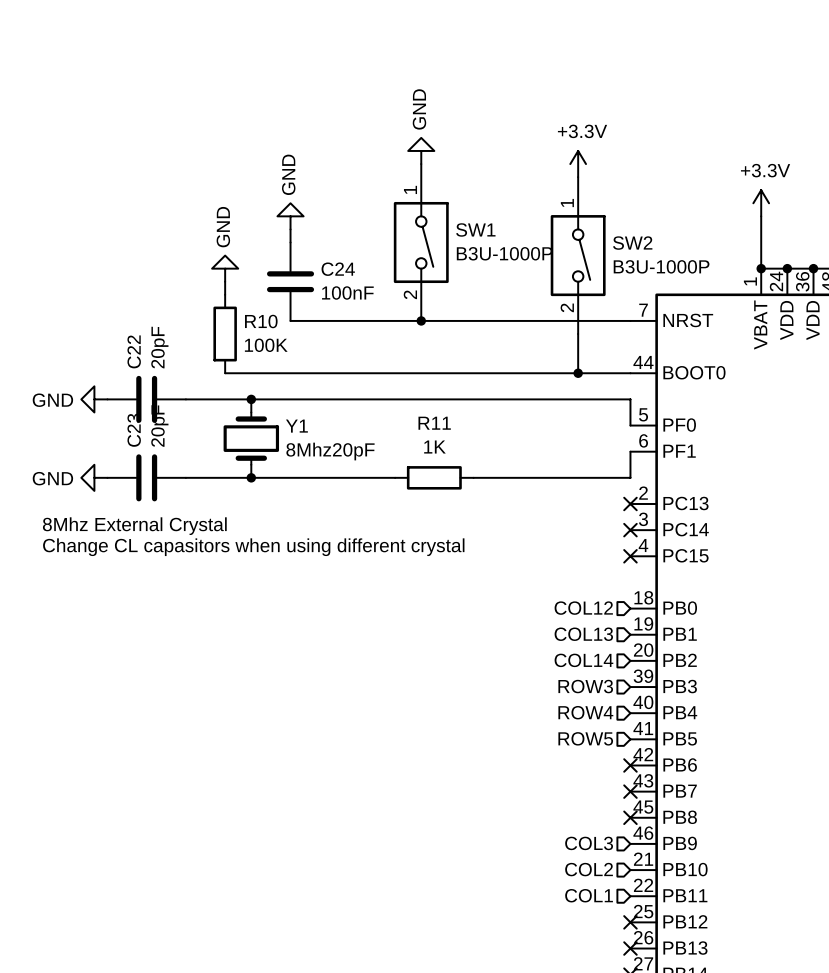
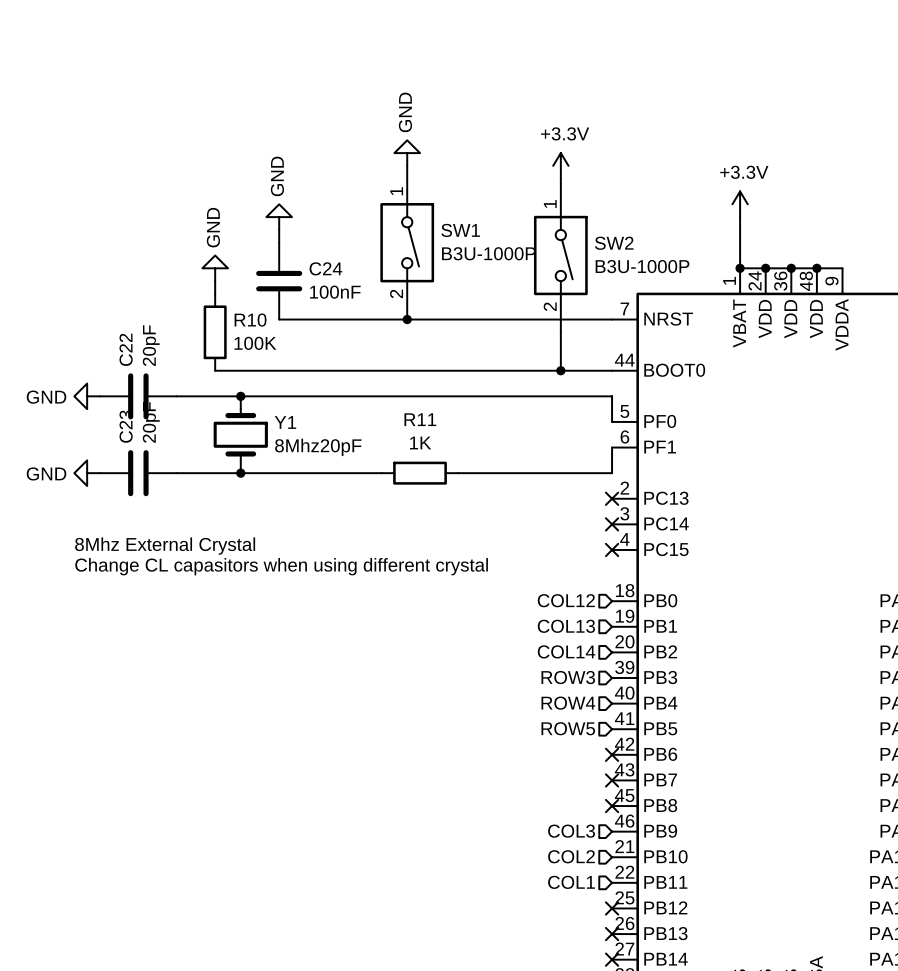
text position: 8Mhz External Crystal (134, 526) -> 8Mhz External Crystal (165, 546)
text position: Change CL capasitors when using different crystal (253, 547) -> Change CL capasitors when using different crystal (281, 566)

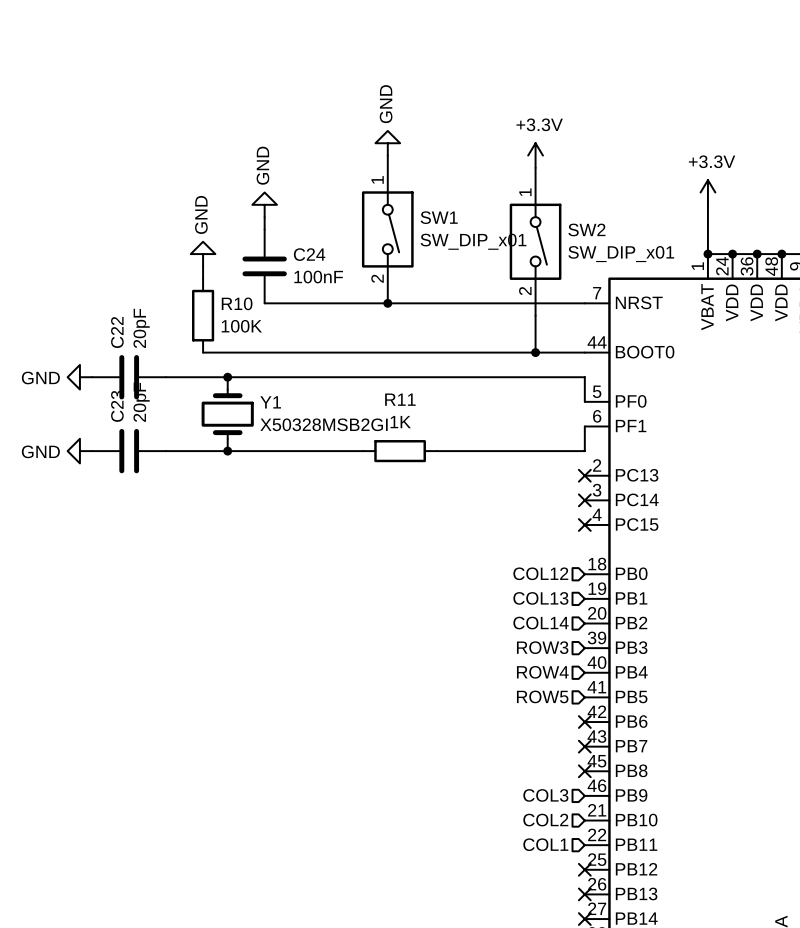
SW1 value: B3U-1000P (488, 253) -> SW_DIP_x01 (473, 241)
SW2 value: B3U-1000P (642, 266) -> SW_DIP_x01 (621, 254)
Y1 value: 8Mhz20pF (318, 447) -> X50328MSB2GI (324, 424)
text: 8Mhz External Crystal (165, 546) -> none
text: Change CL capasitors when using different crystal (281, 566) -> none

